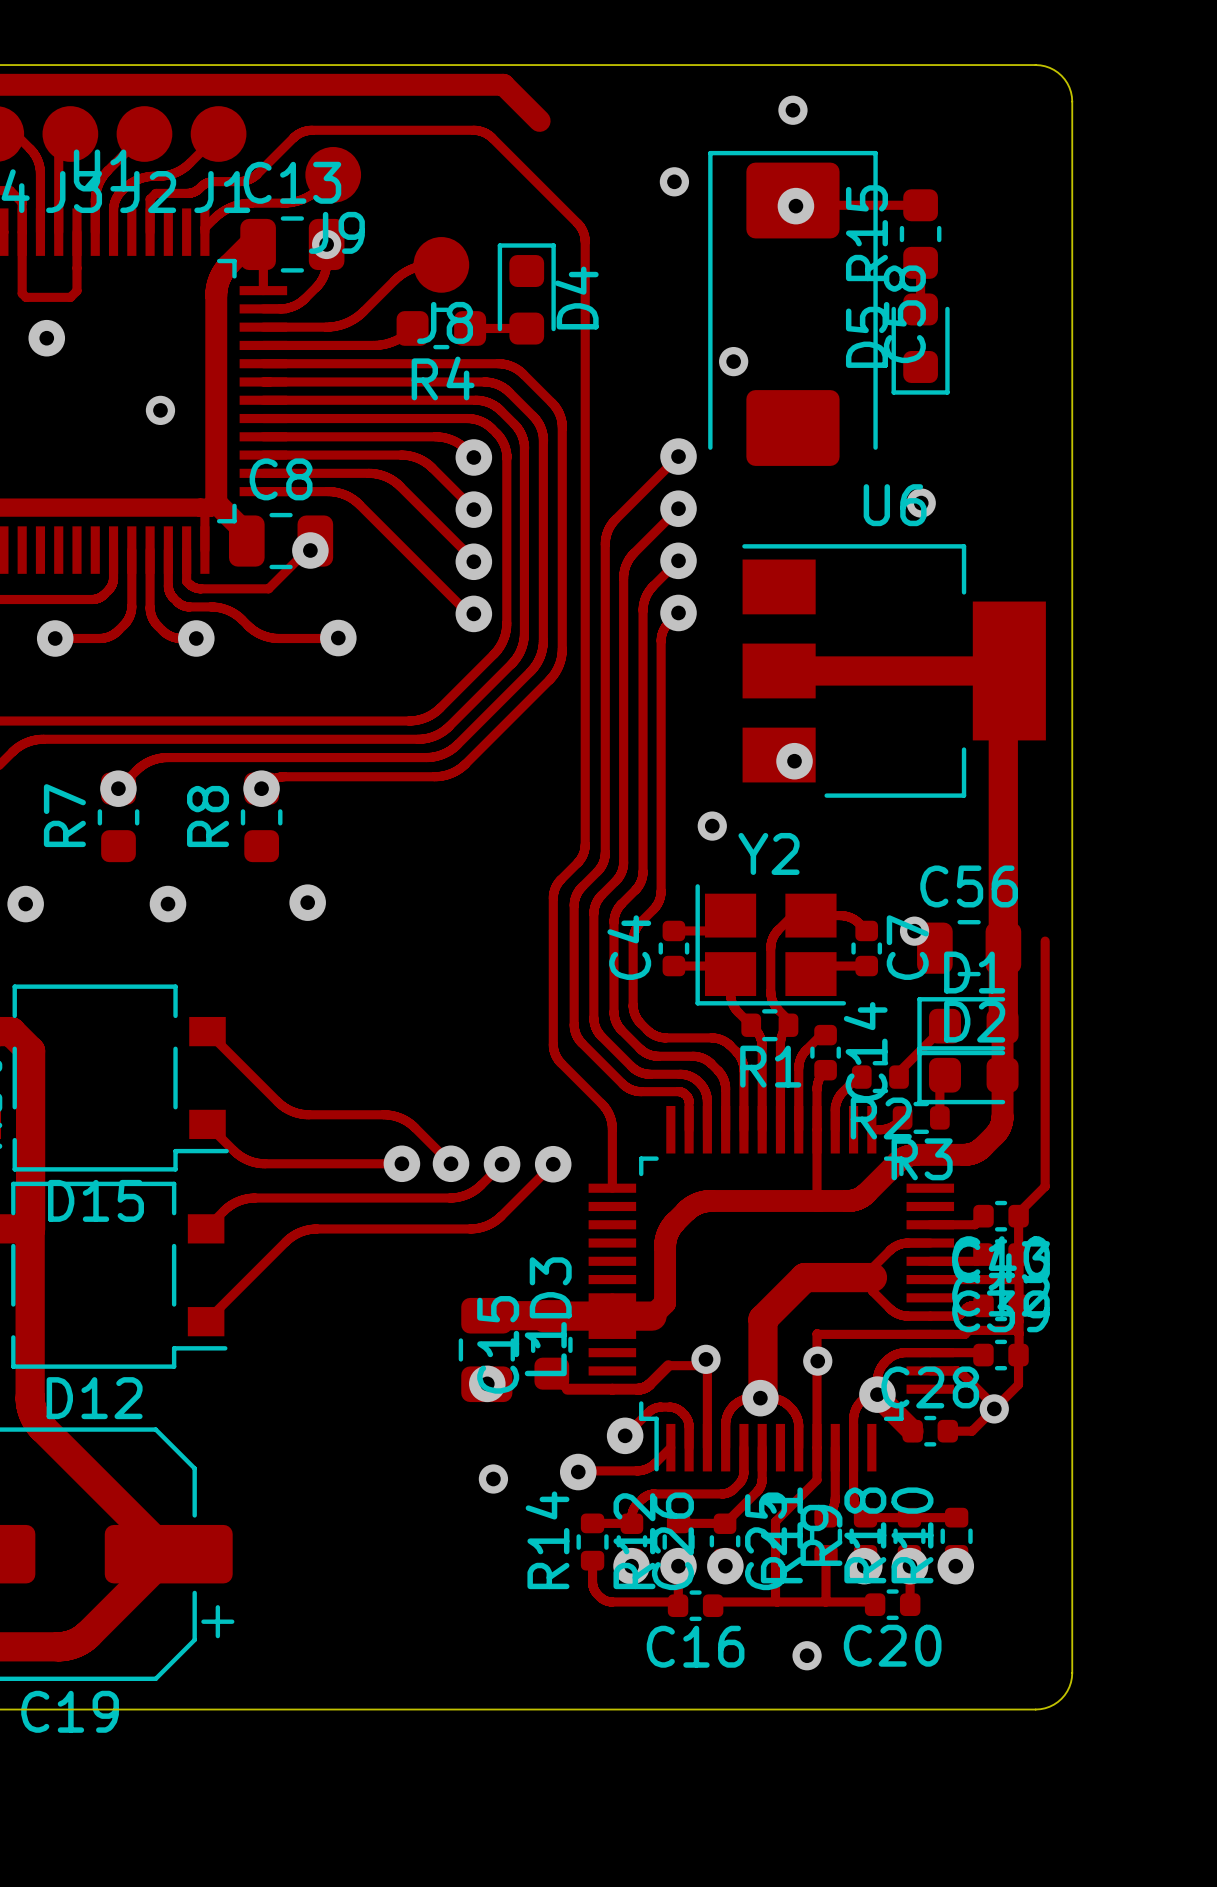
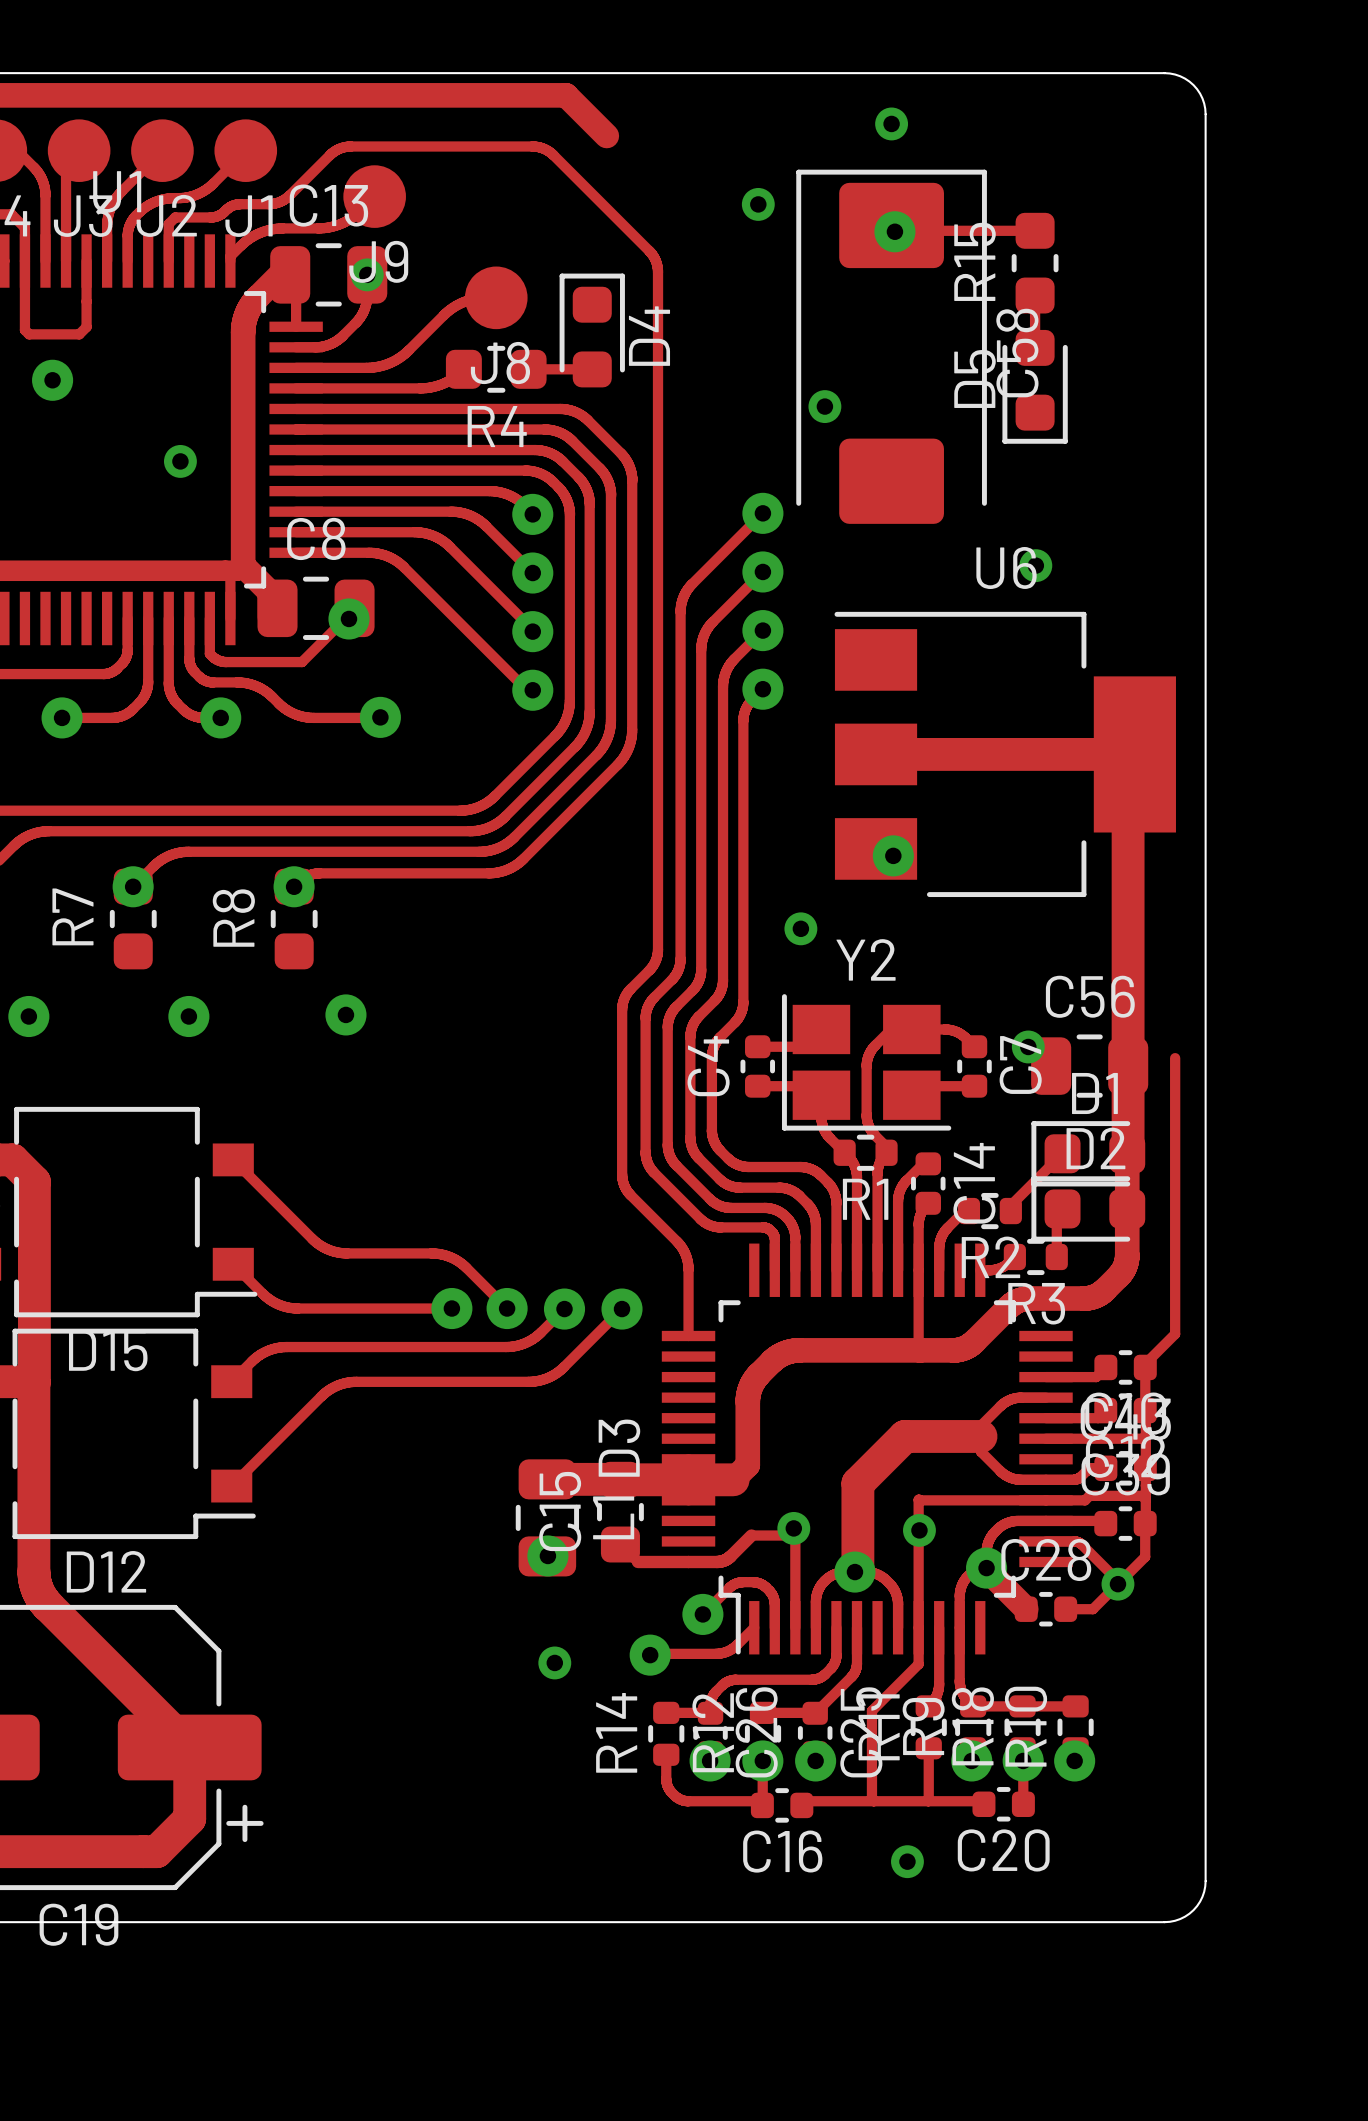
track: (168, 1554) (85, 1636) (72, 1644) (57, 1646) -> (189, 1747) (189, 1818) (156, 1851) (65, 1851)

